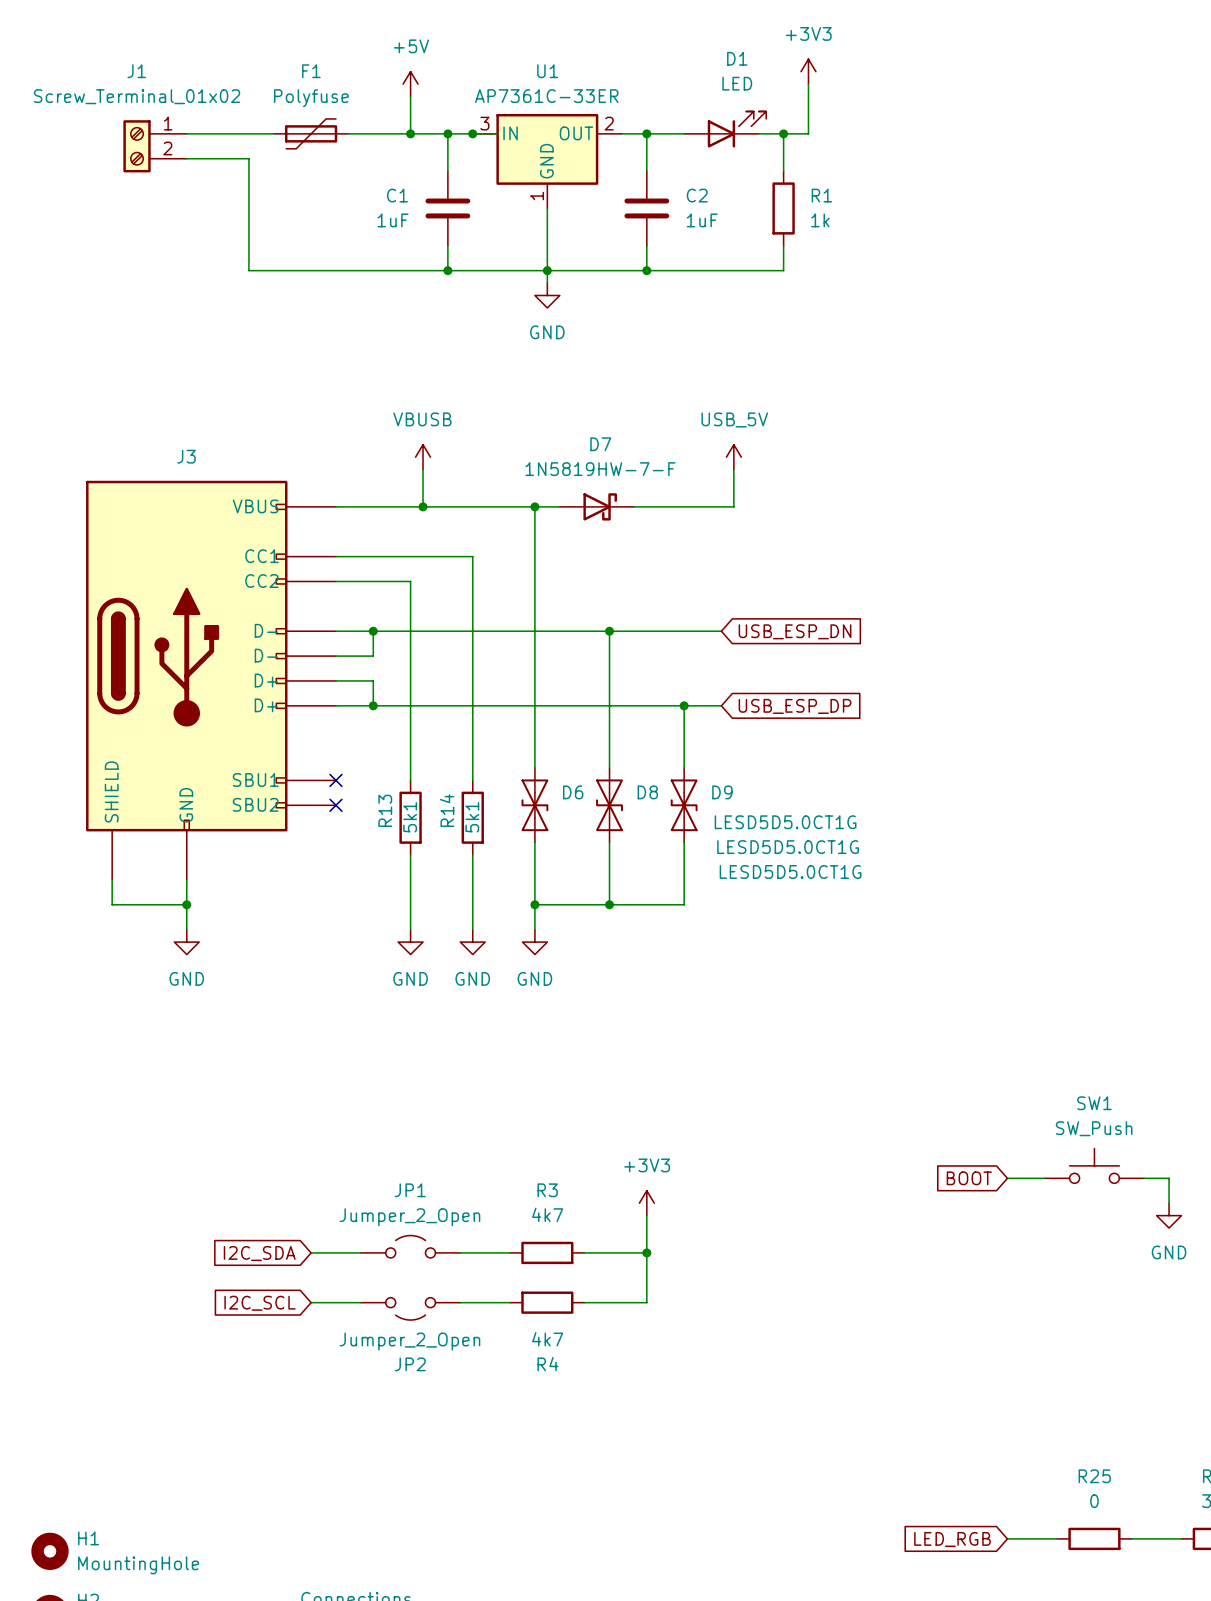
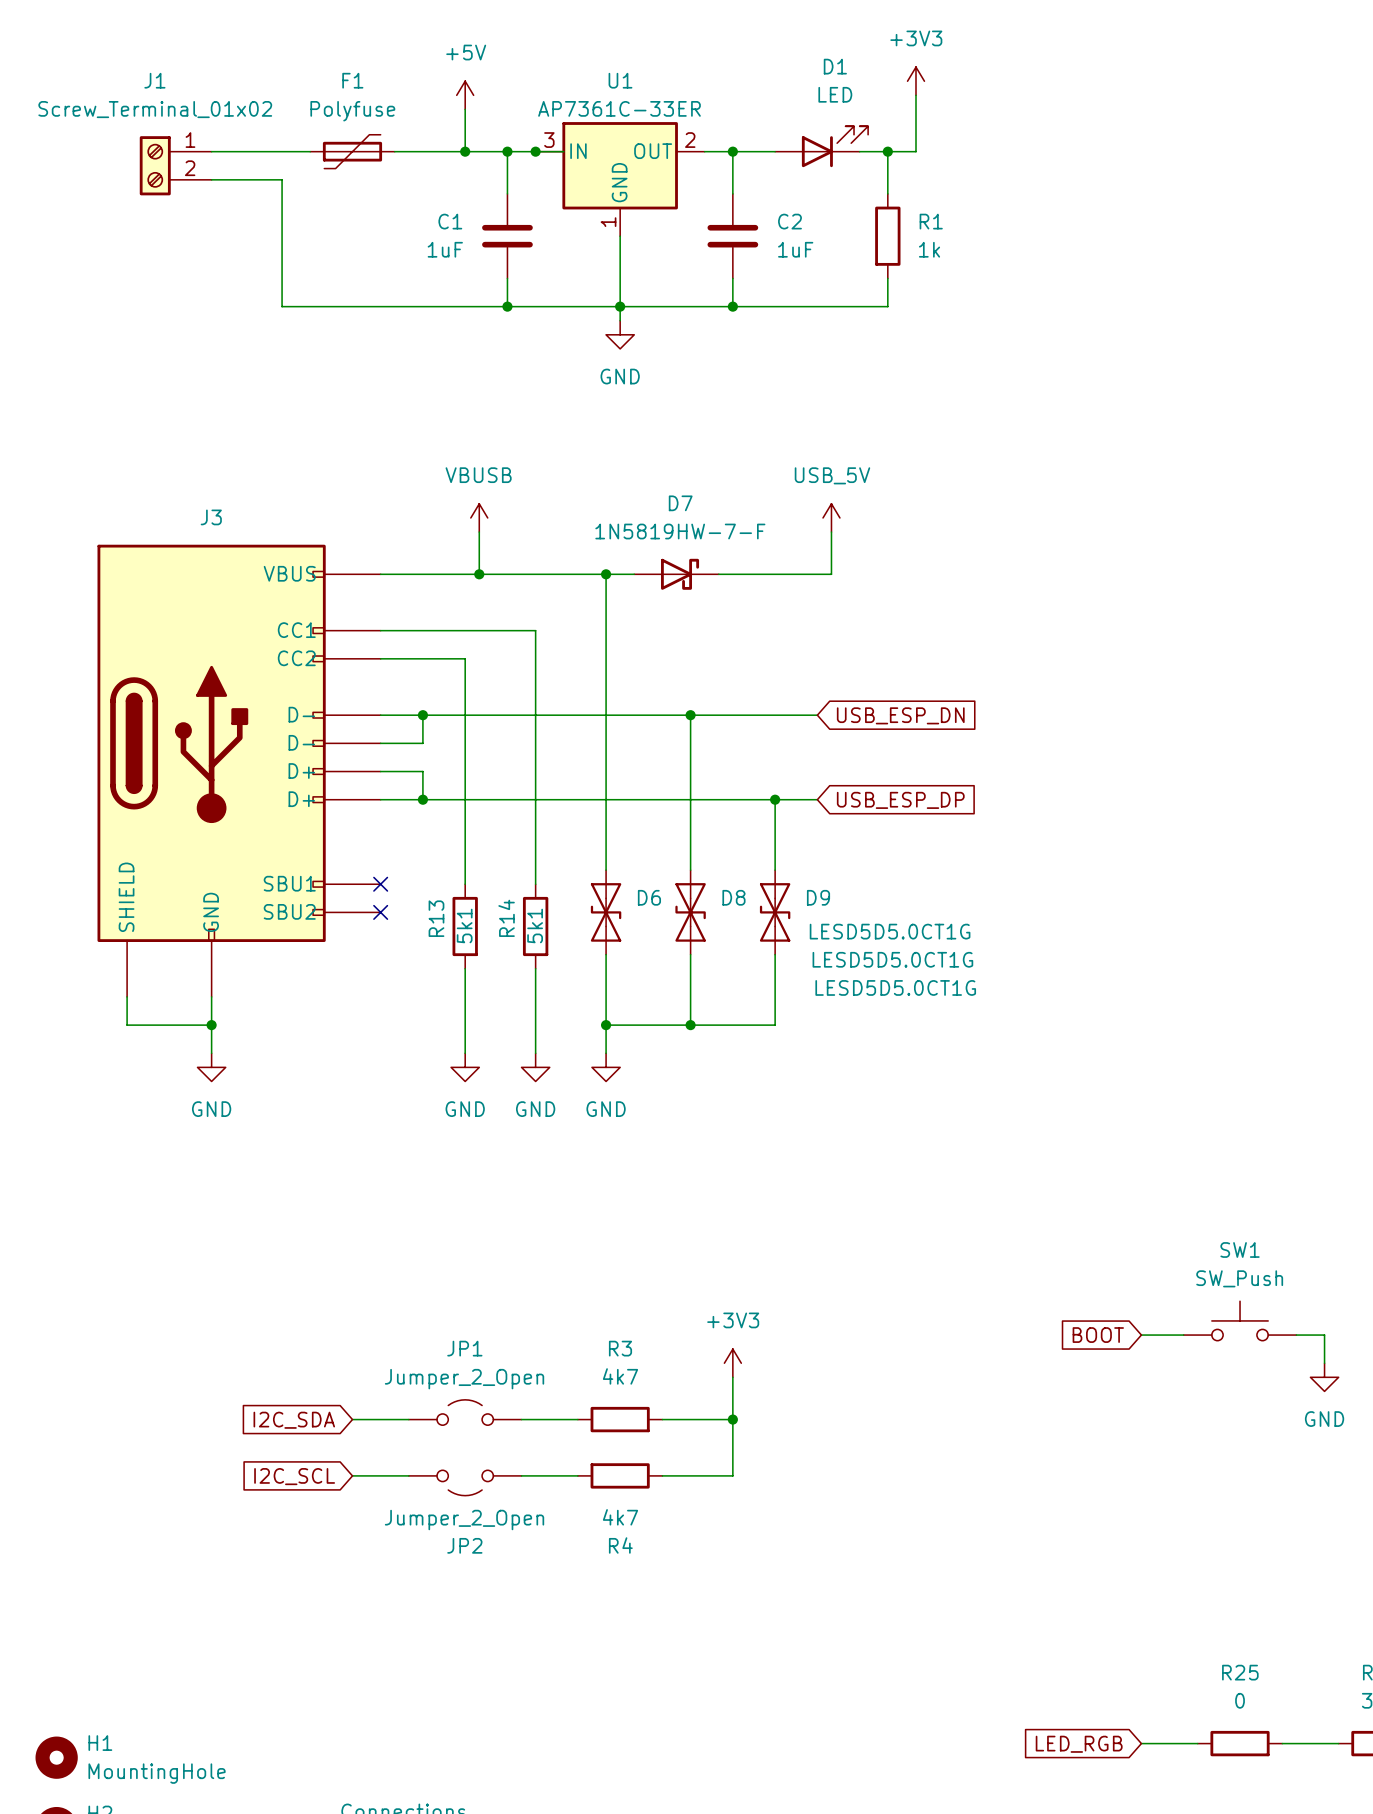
U1 symbol: [472, 113, 622, 209] -> [535, 122, 705, 237]

